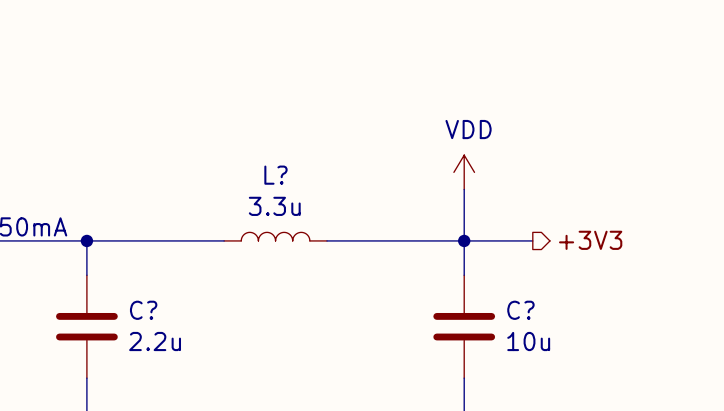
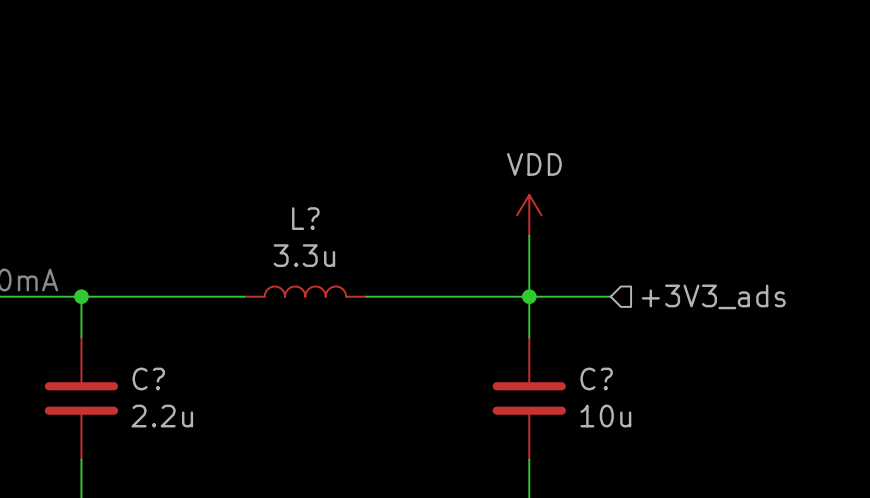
hierarchical label shape: output (590, 240) -> input (713, 296)
hierarchical label: +3V3 (590, 240) -> +3V3_ads (713, 296)

